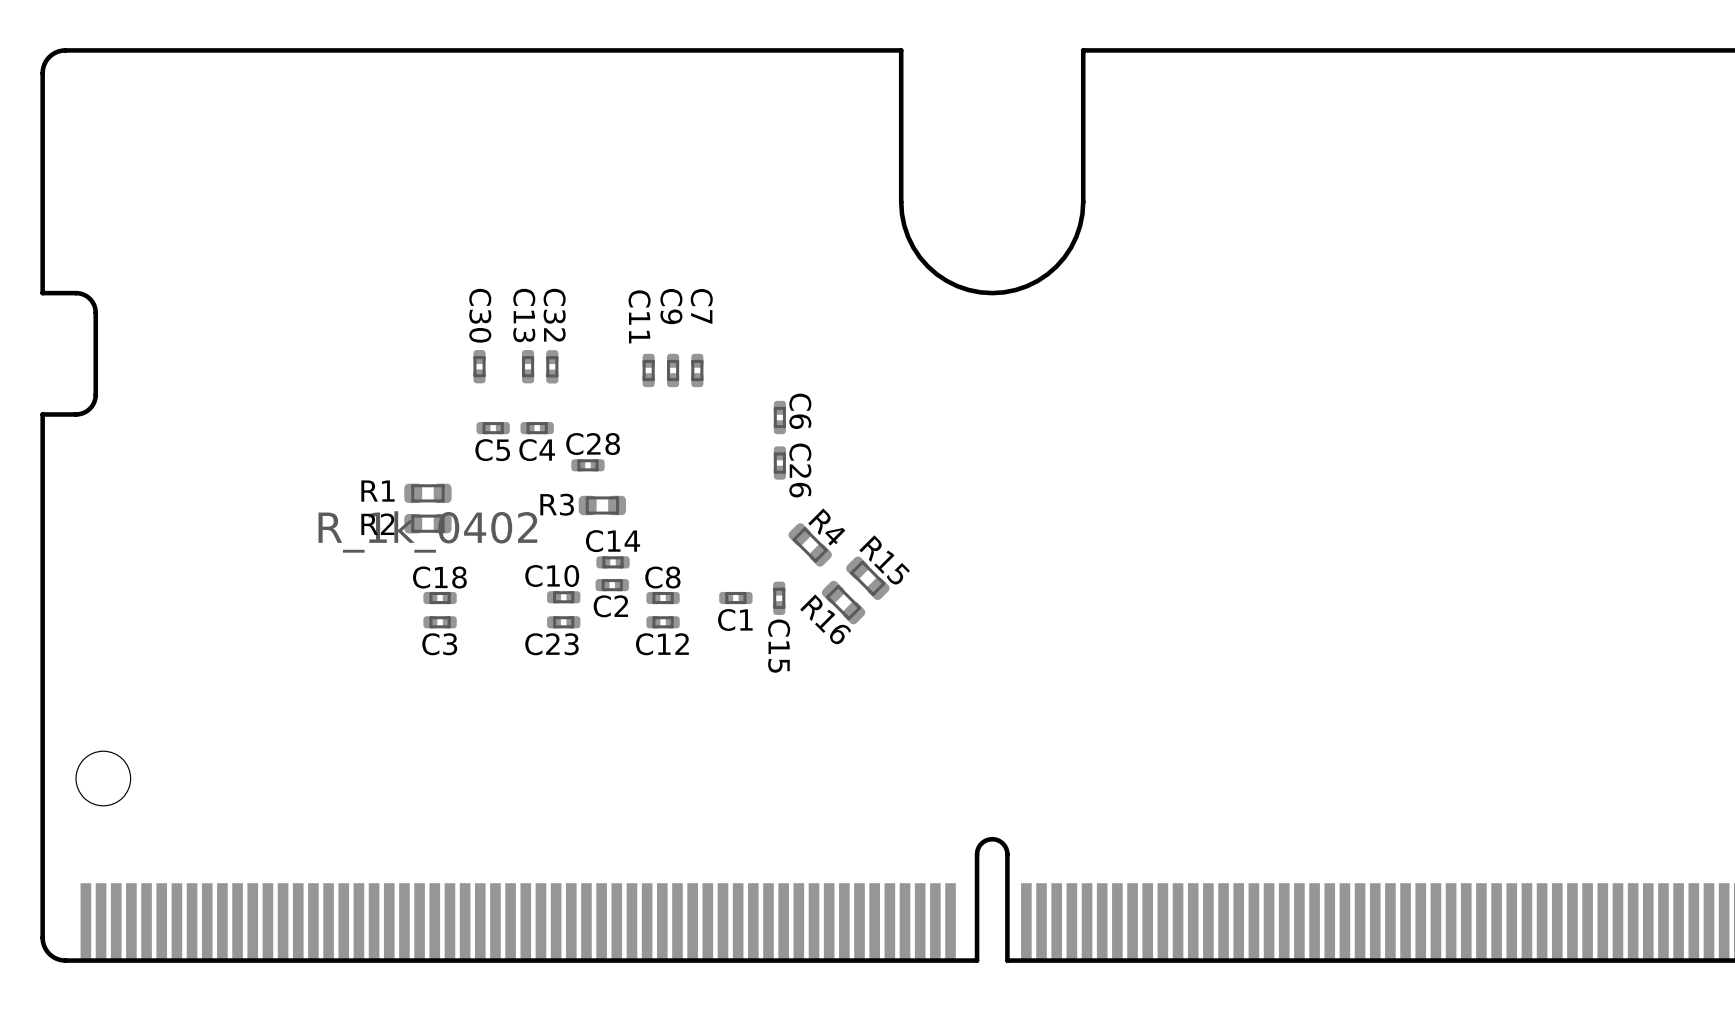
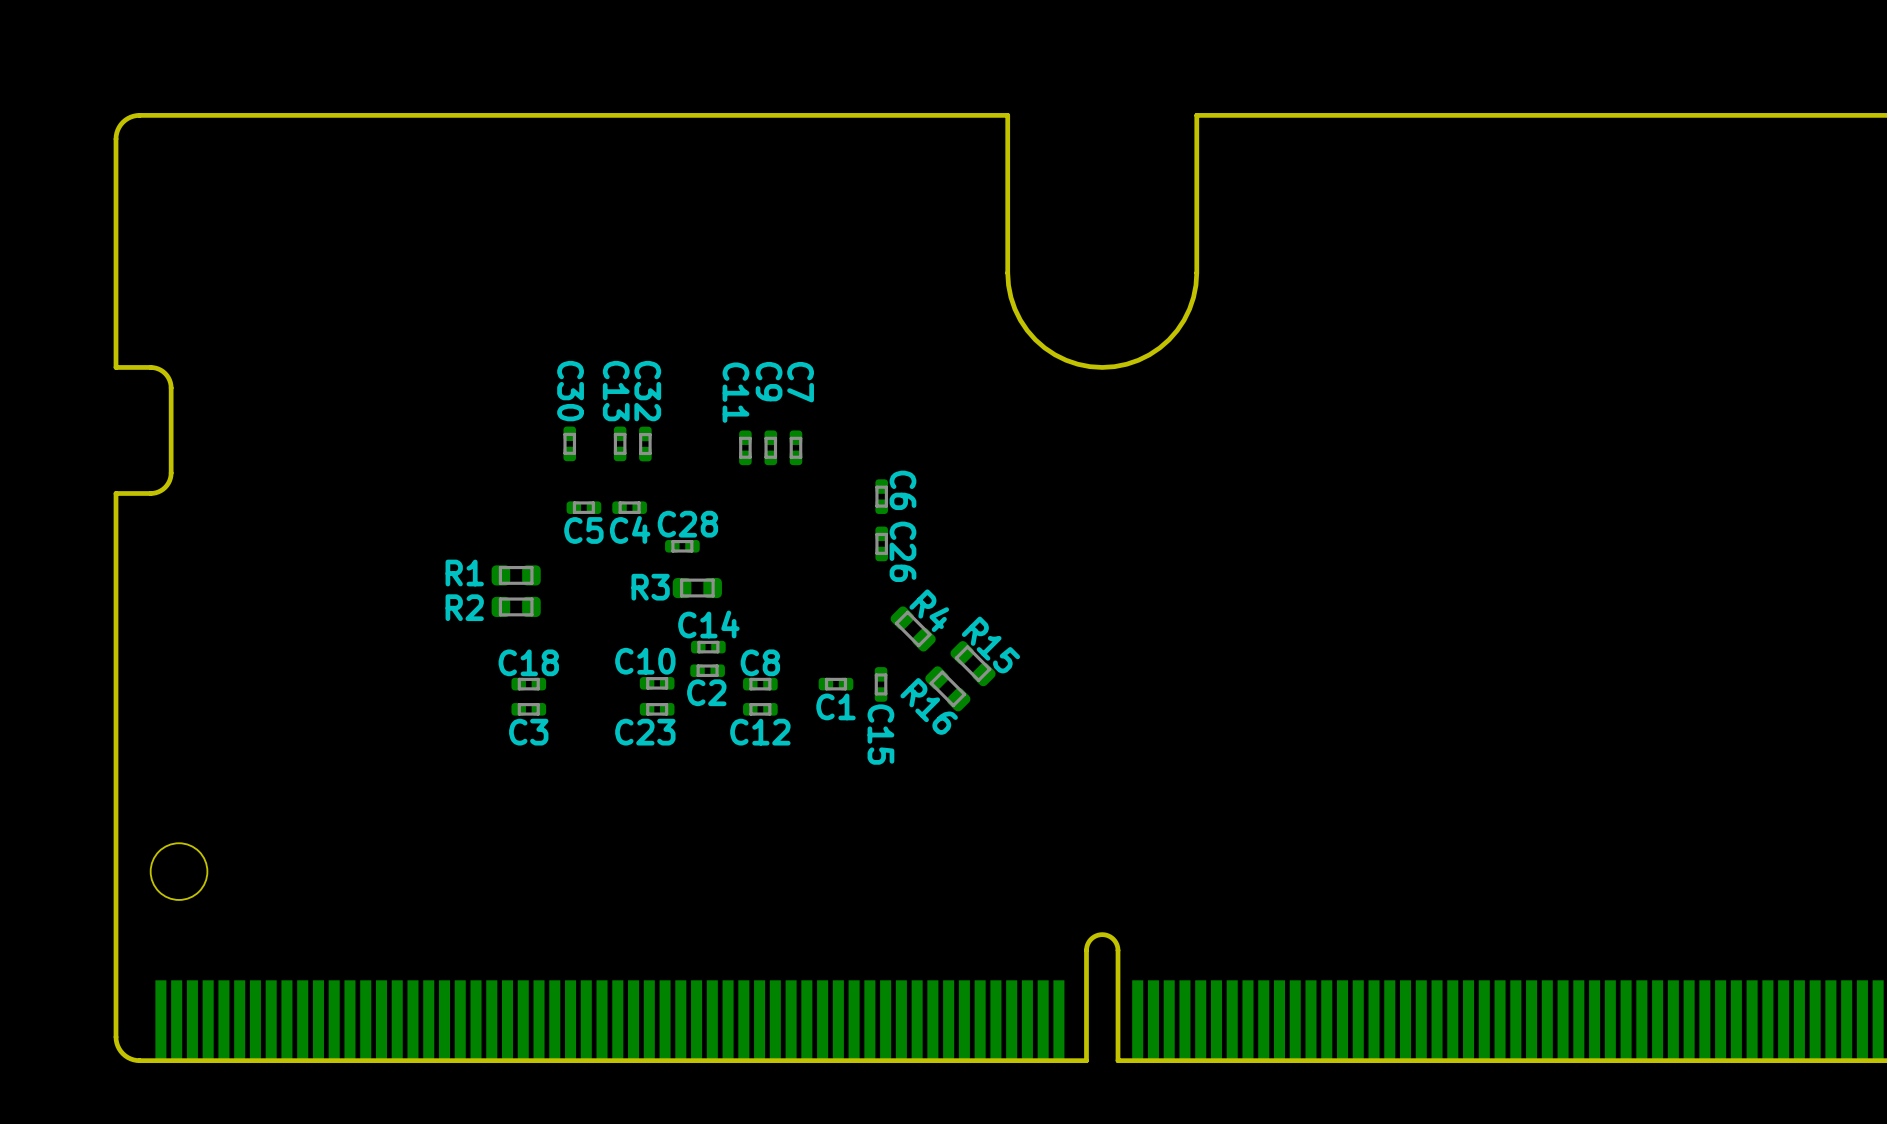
R1 value: R_1k_0402 (427, 531) -> none

